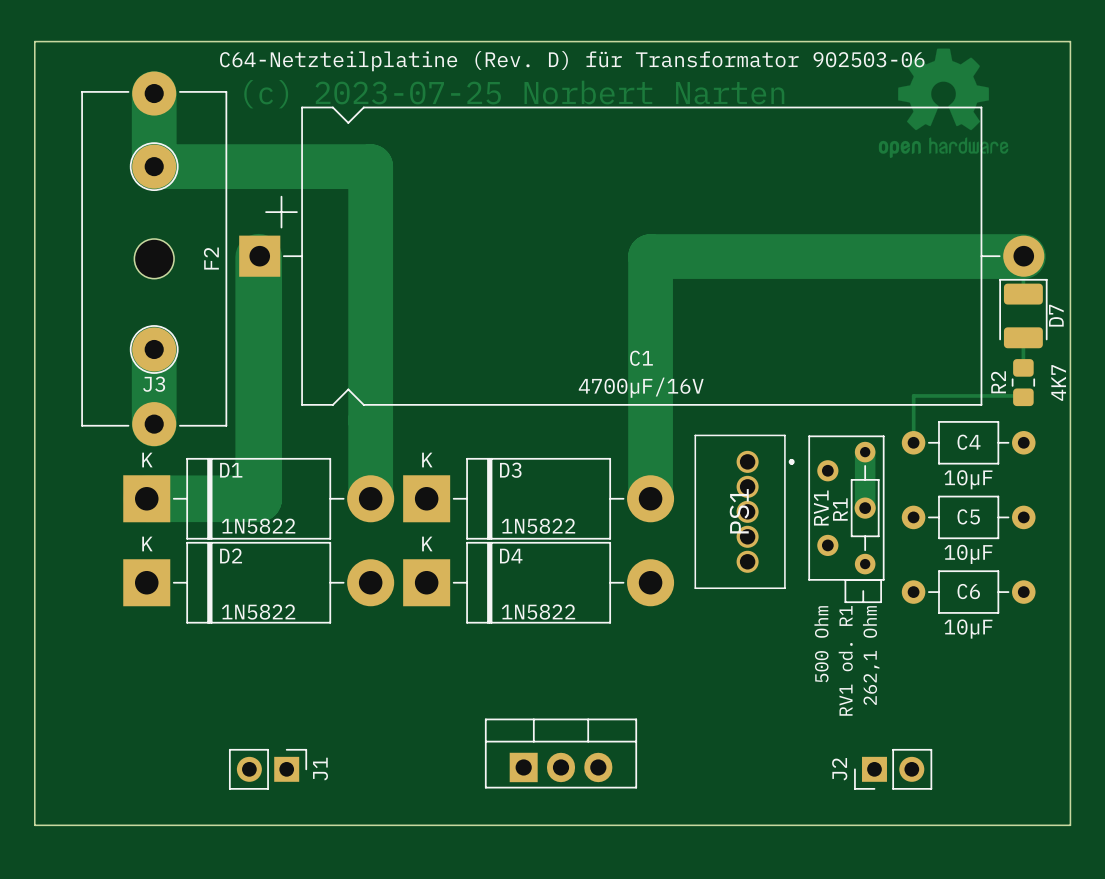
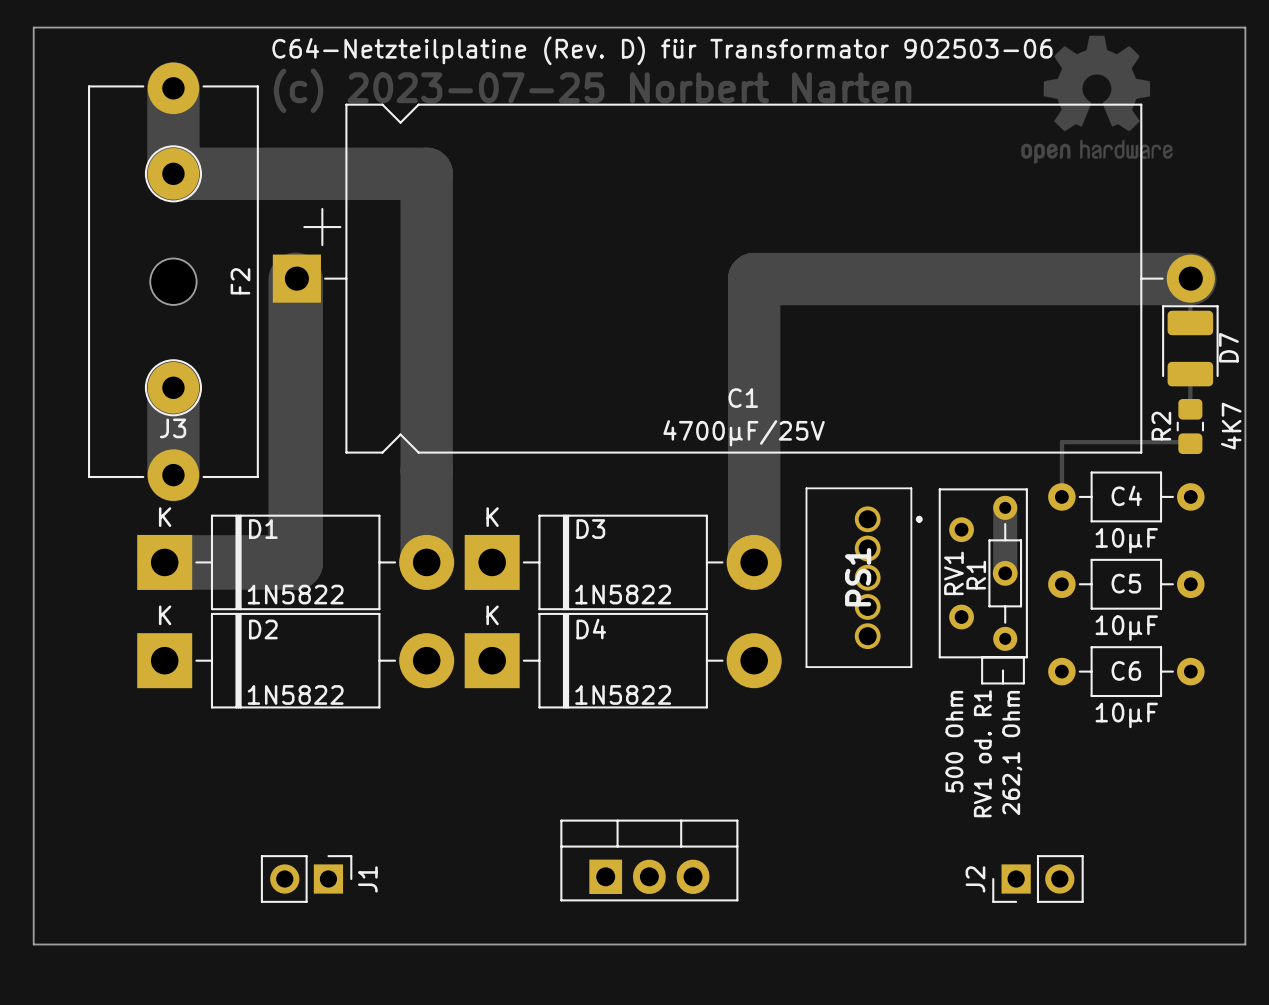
C1 value: 4700µF/16V (641, 387) -> 4700µF/25V (744, 433)

